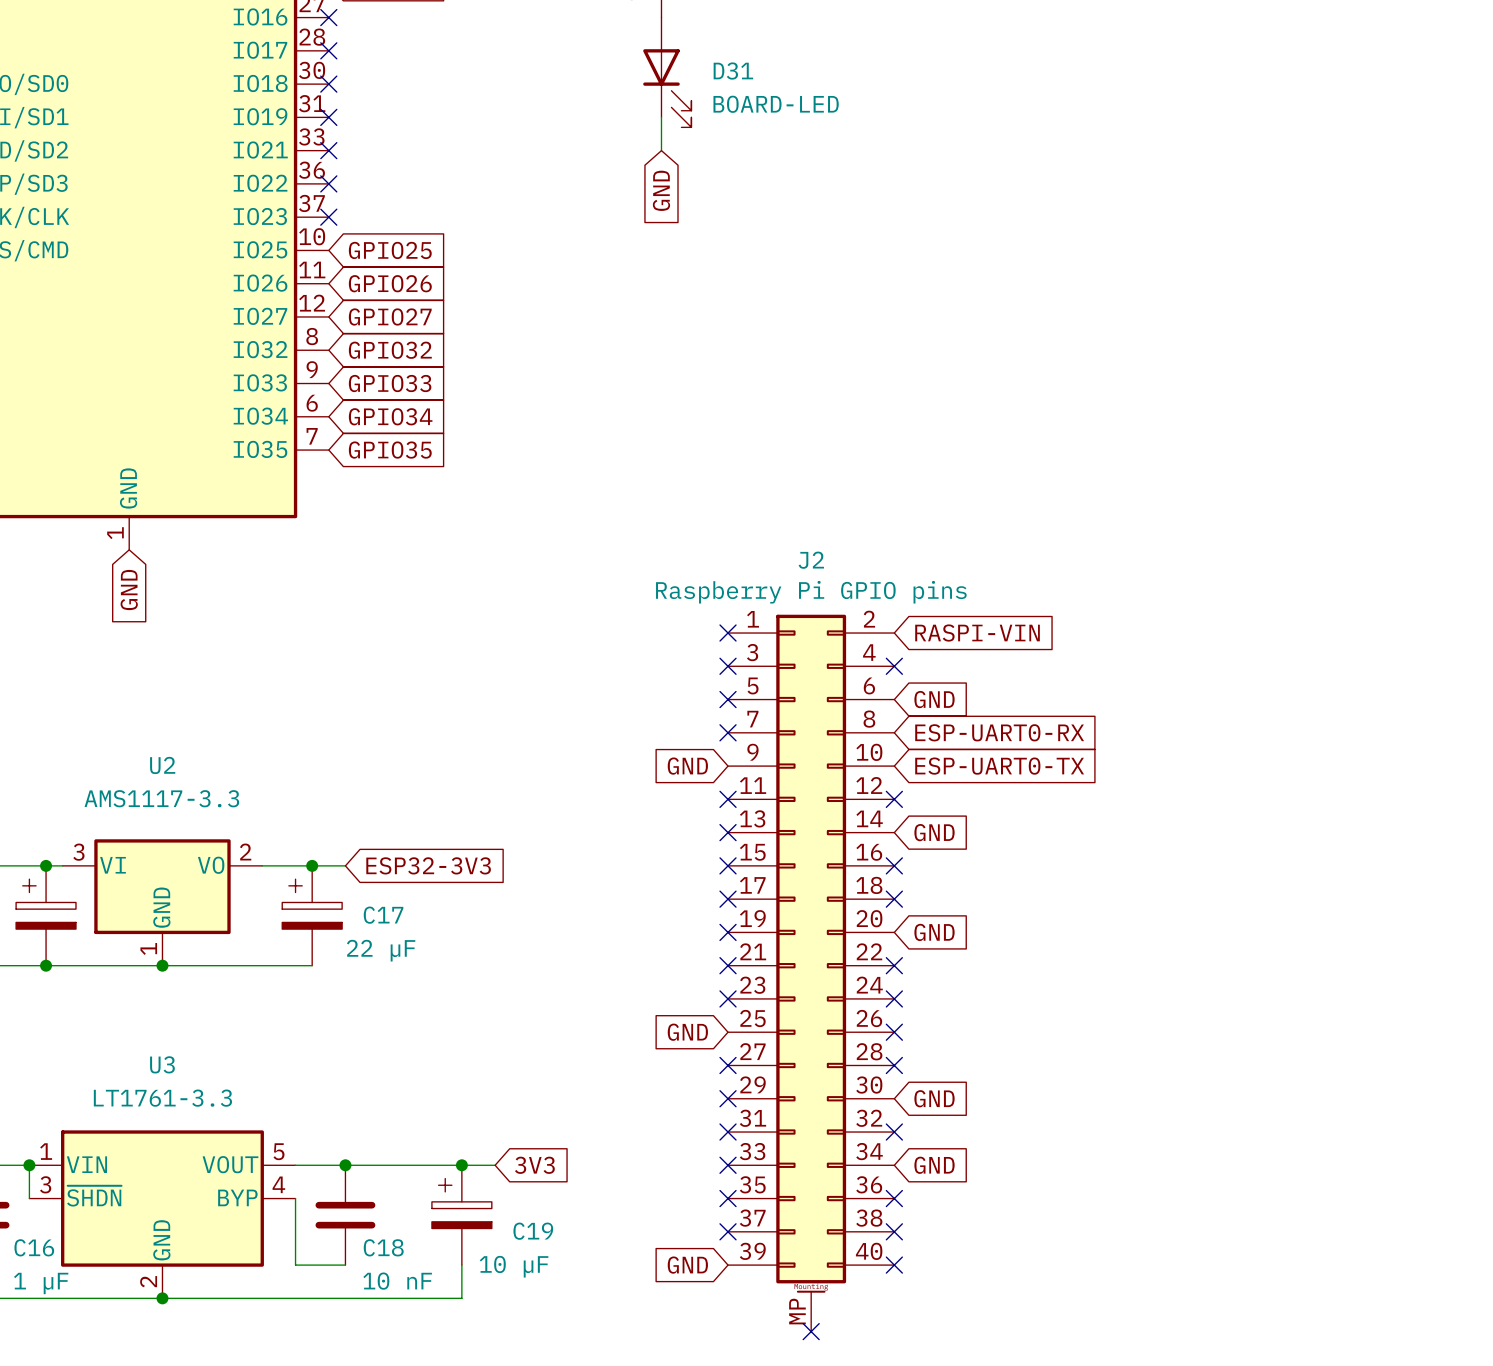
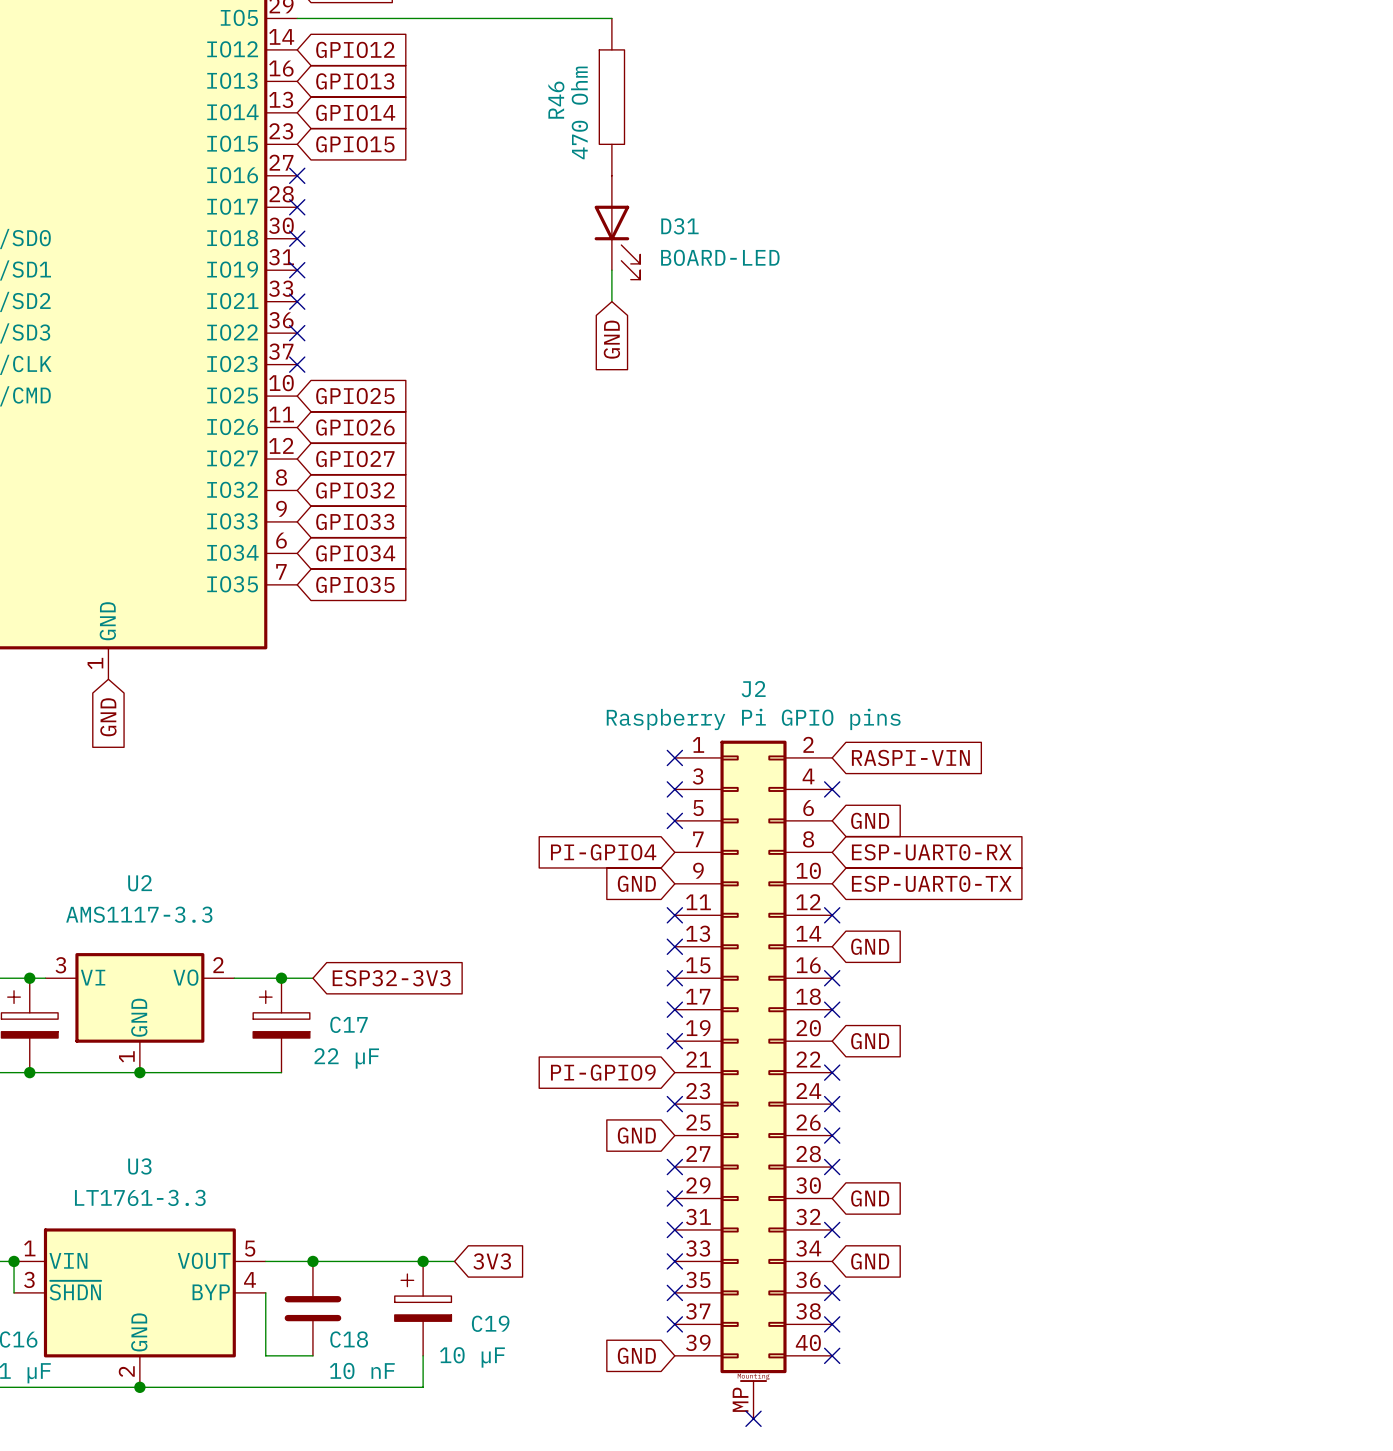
global label: none -> PI-GPIO4 (603, 852)
no-connect mark: (728, 732) -> none
global label: none -> PI-GPIO9 (603, 1072)
no-connect mark: (728, 965) -> none

